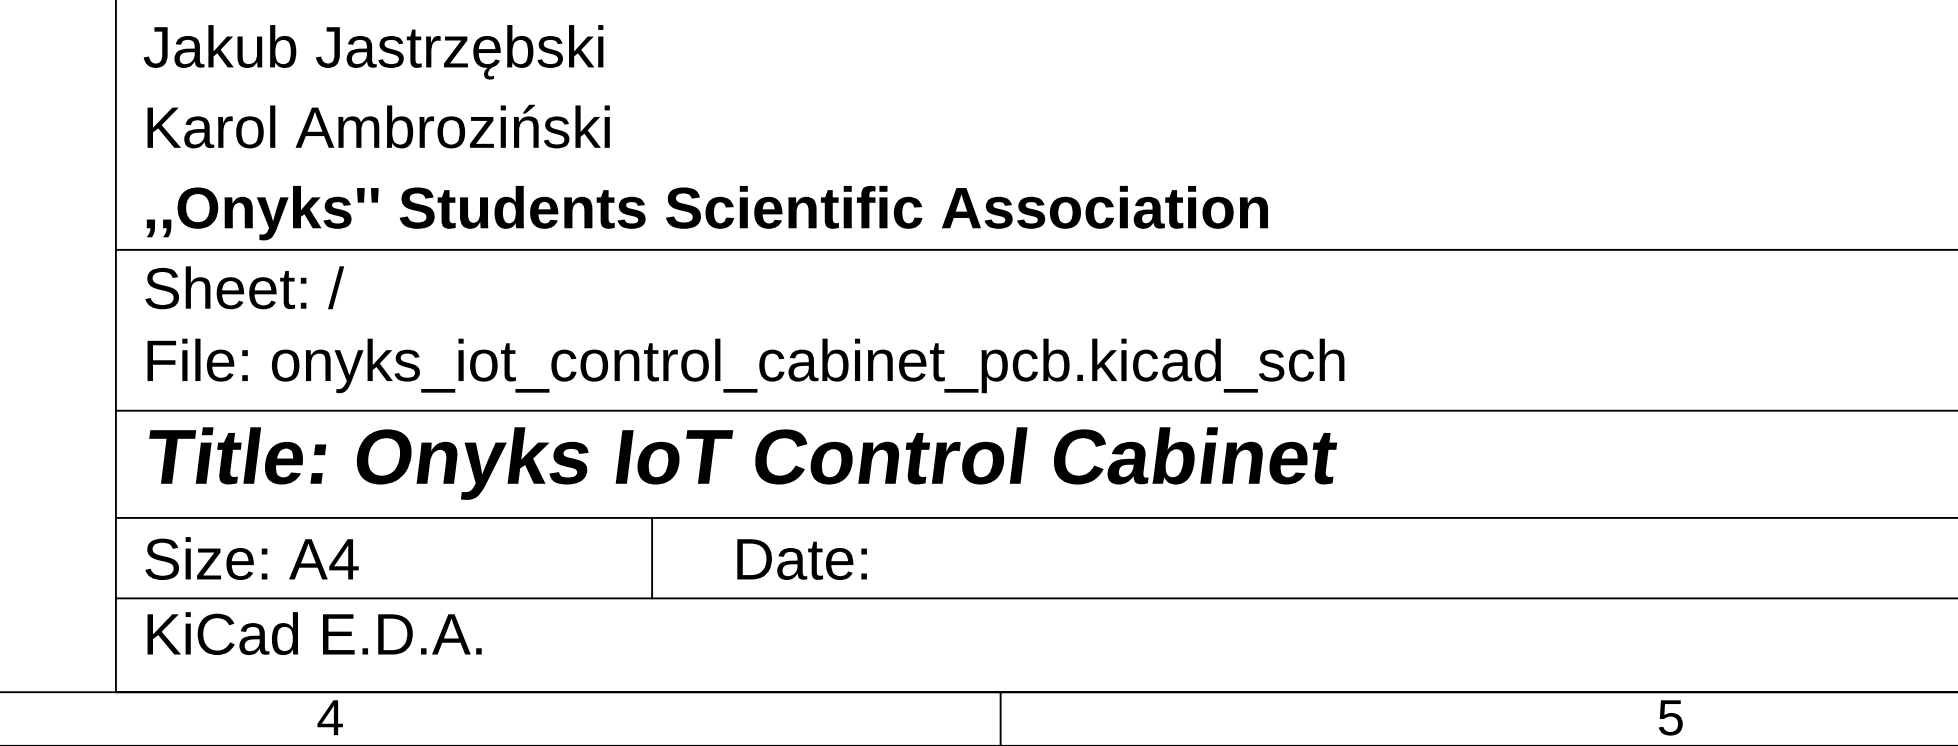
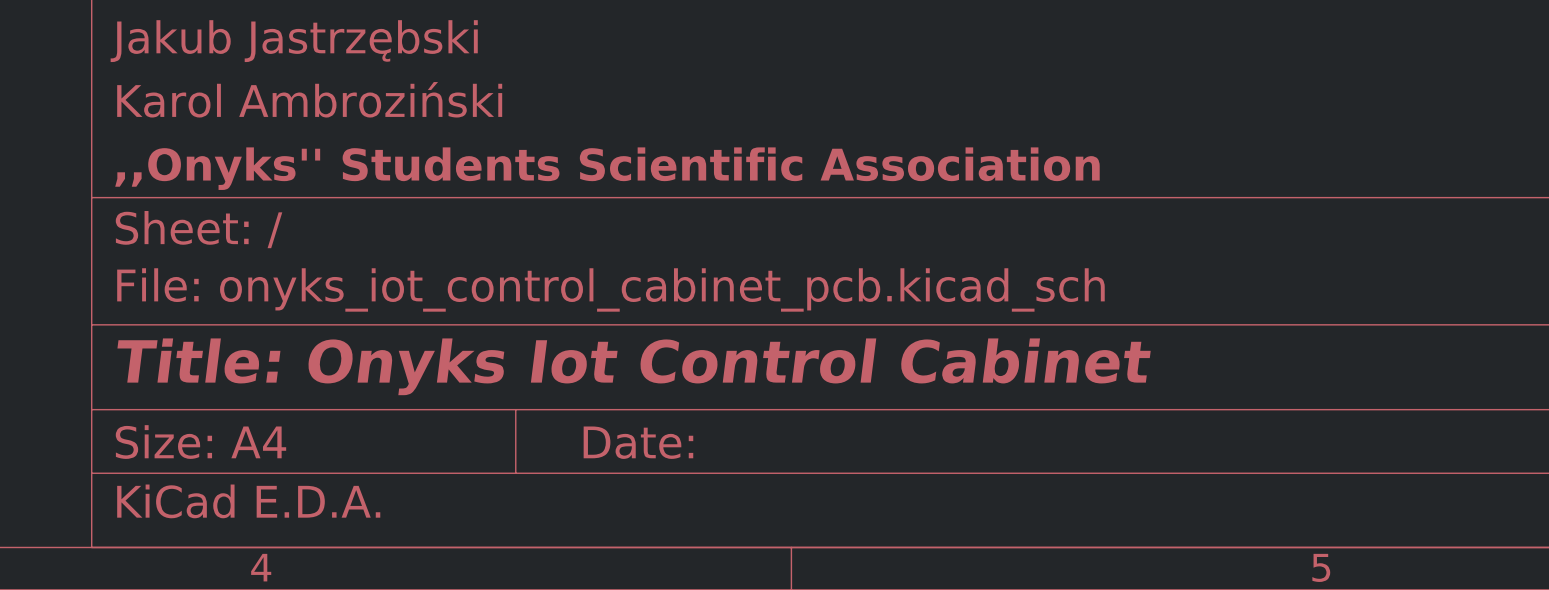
title block: Title: Onyks IoT Control Cabinet (743, 463) -> Title: Onyks Iot Control Cabinet (634, 366)

